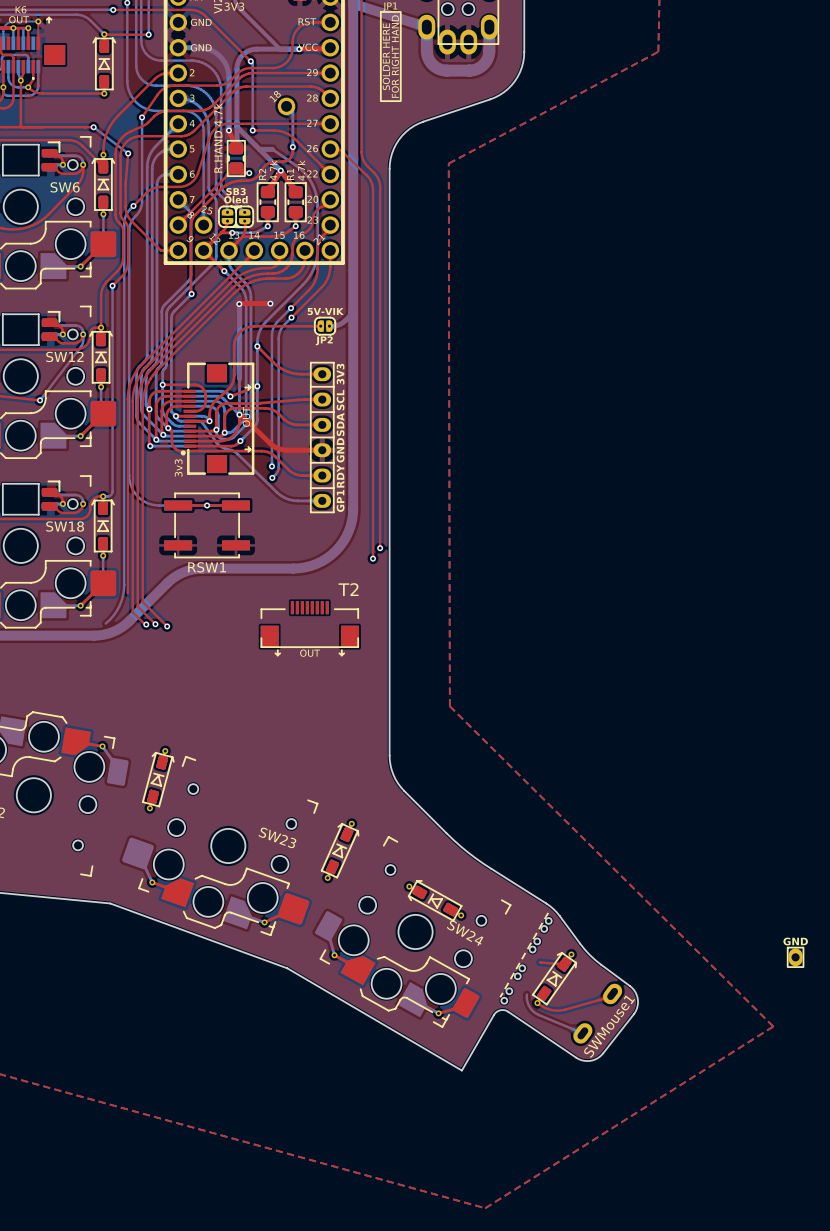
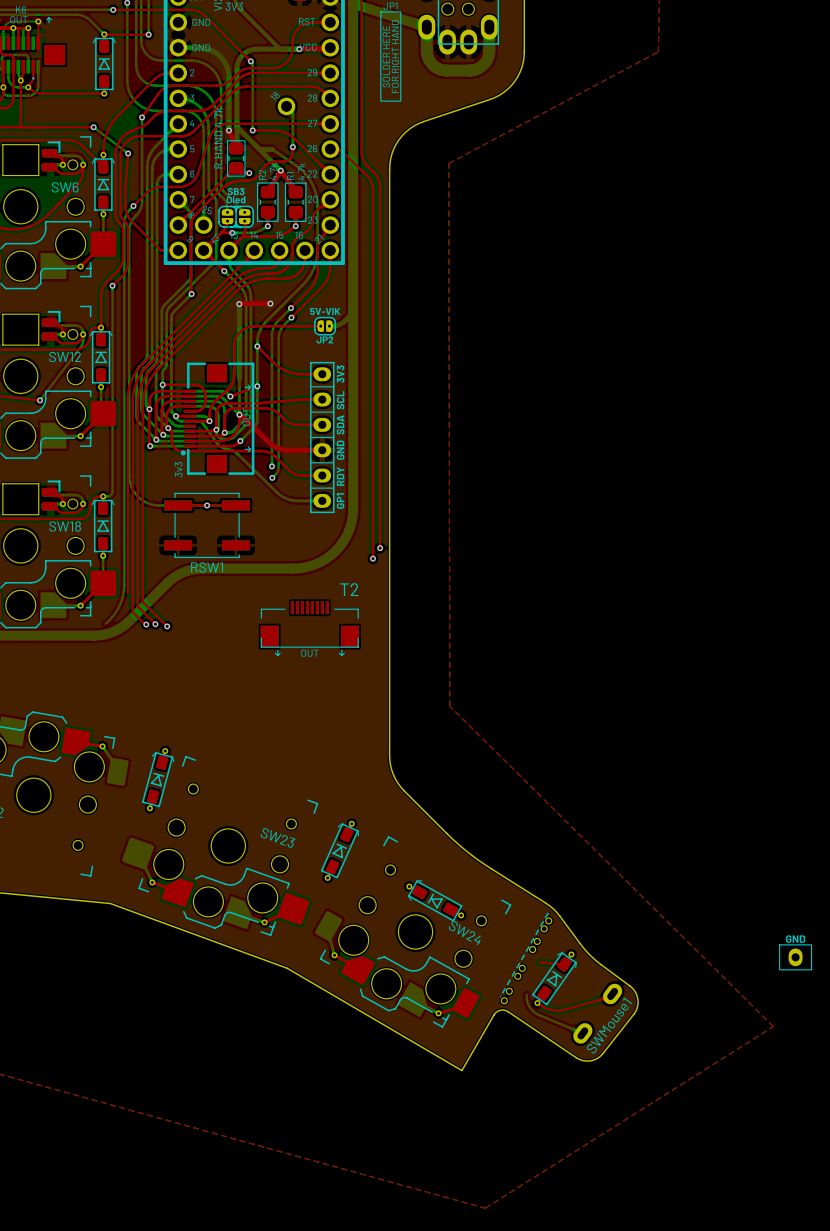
part footprint: [787, 947, 804, 968] -> [779, 944, 813, 971]

